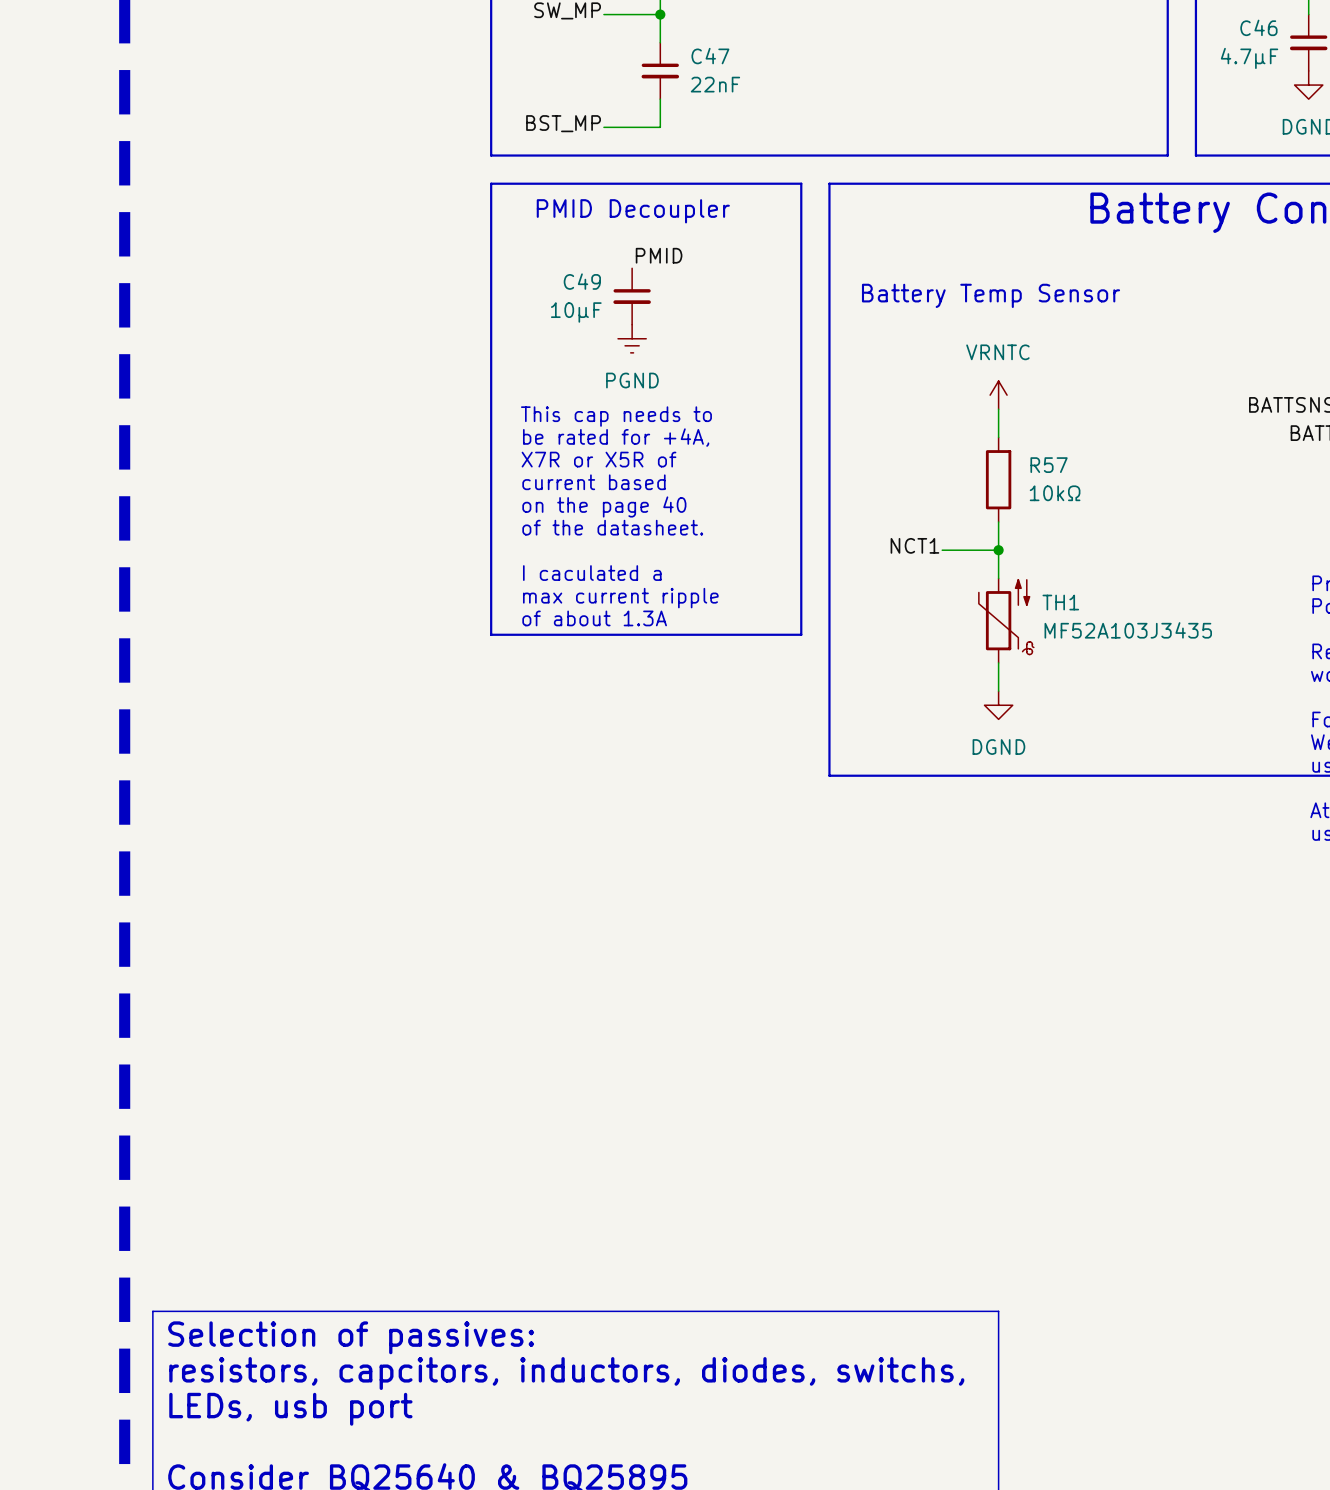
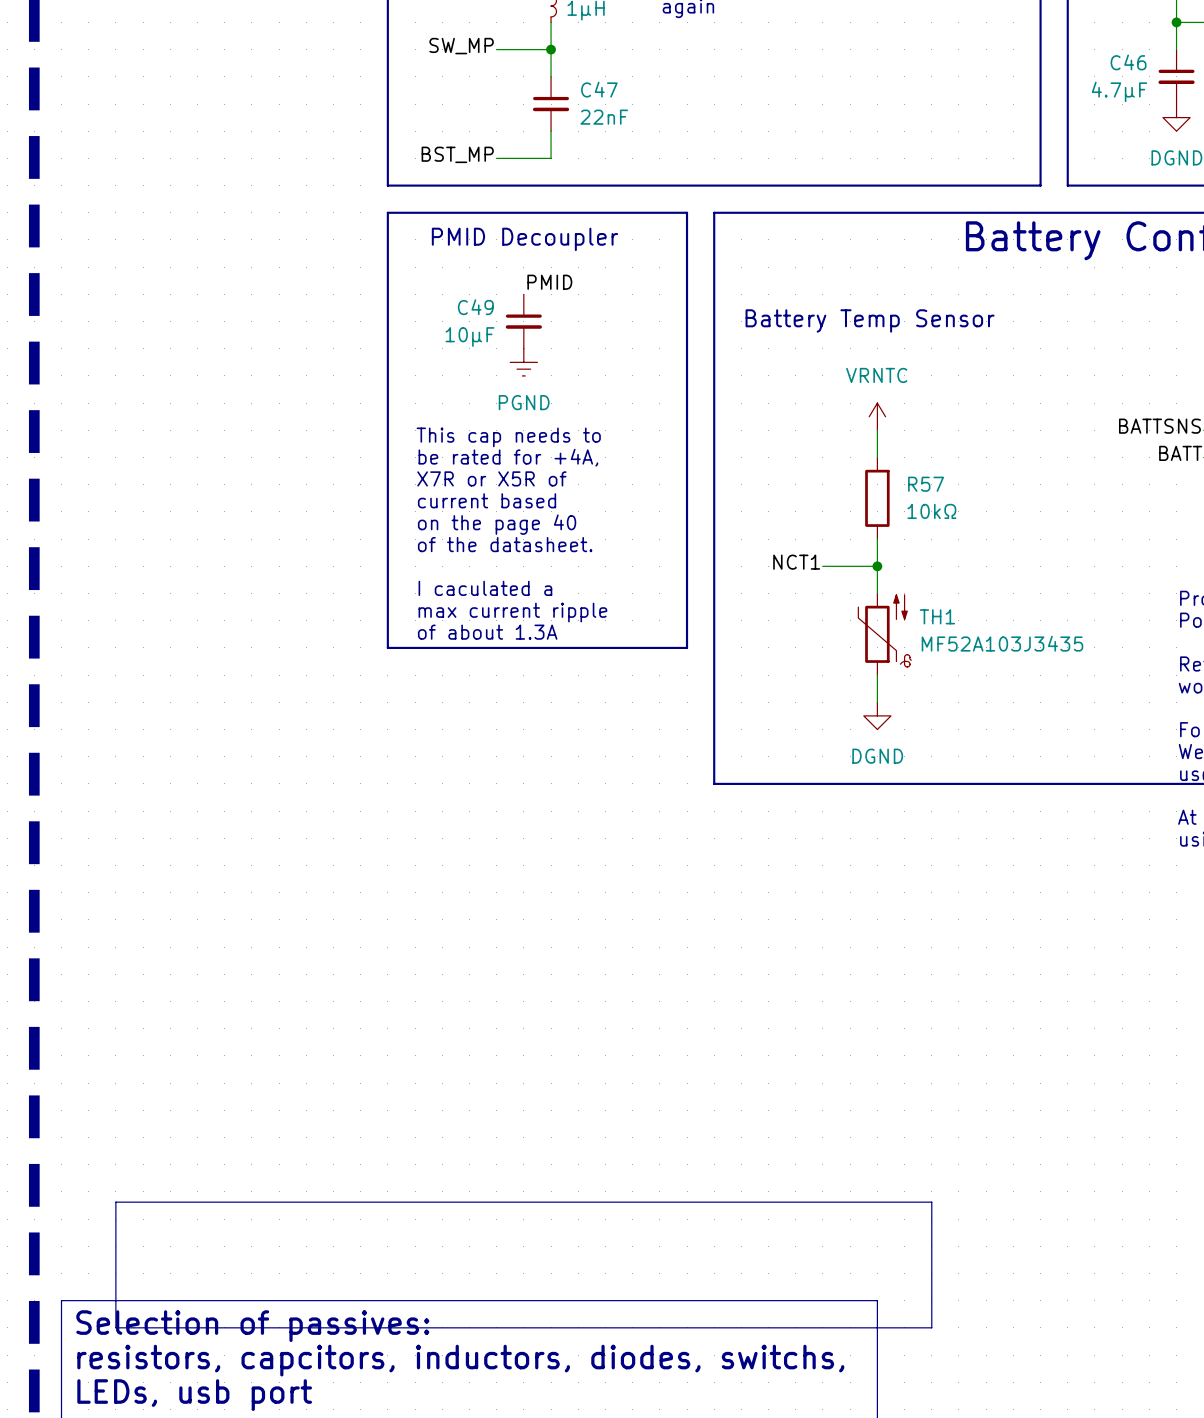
line: none -> (115, 1202) (931, 1202) (931, 1327) (115, 1327) (115, 1202)

